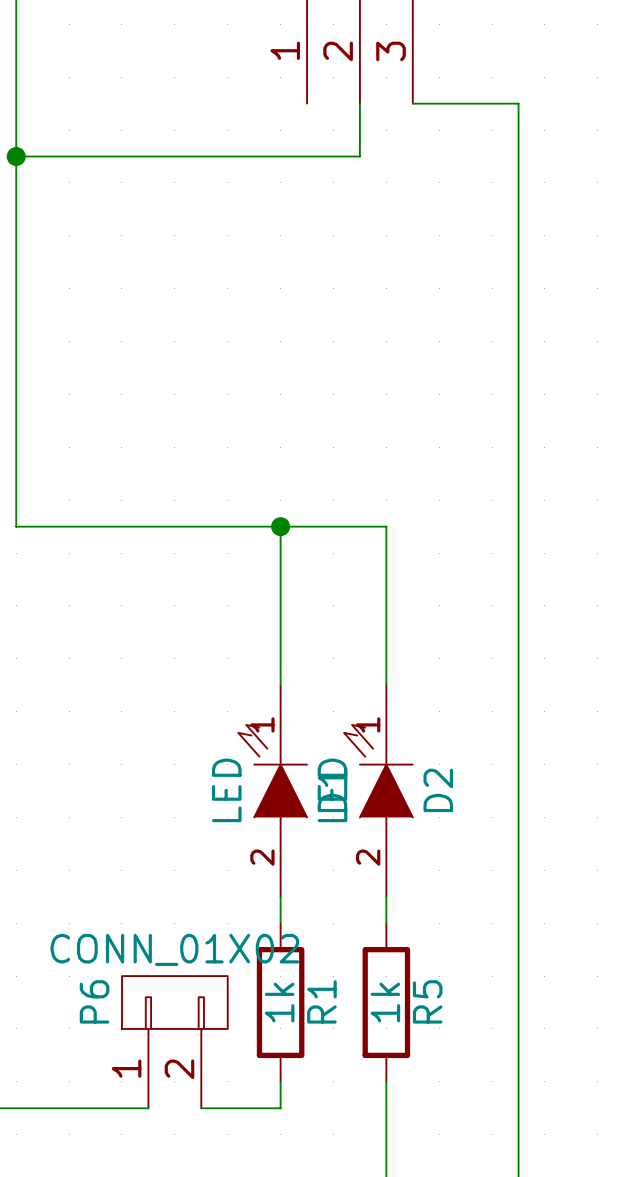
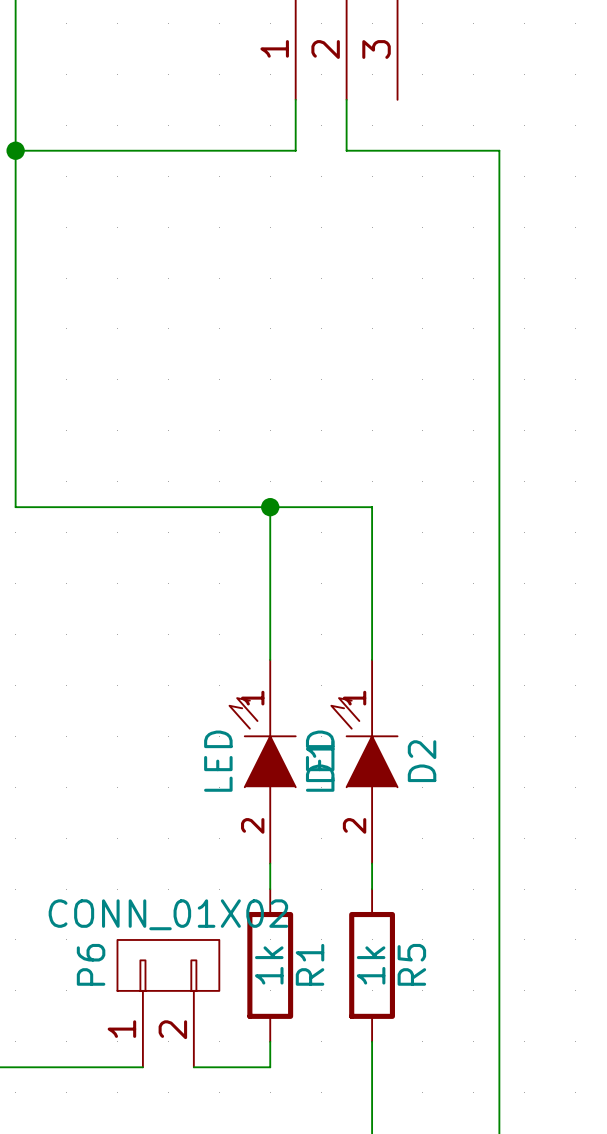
wire: (412, 103) (518, 103) (518, 156) -> (346, 150) (499, 150)
wire: (307, 156) (359, 156) -> (295, 150) (295, 99)

